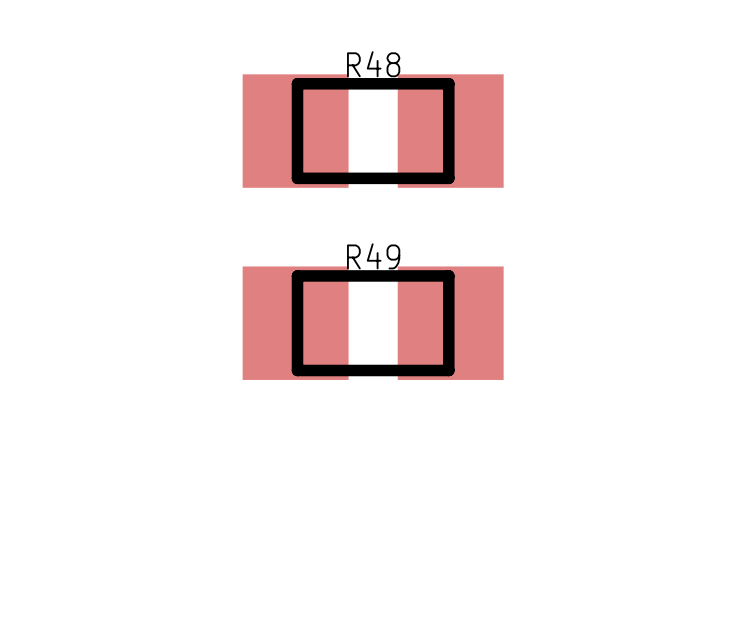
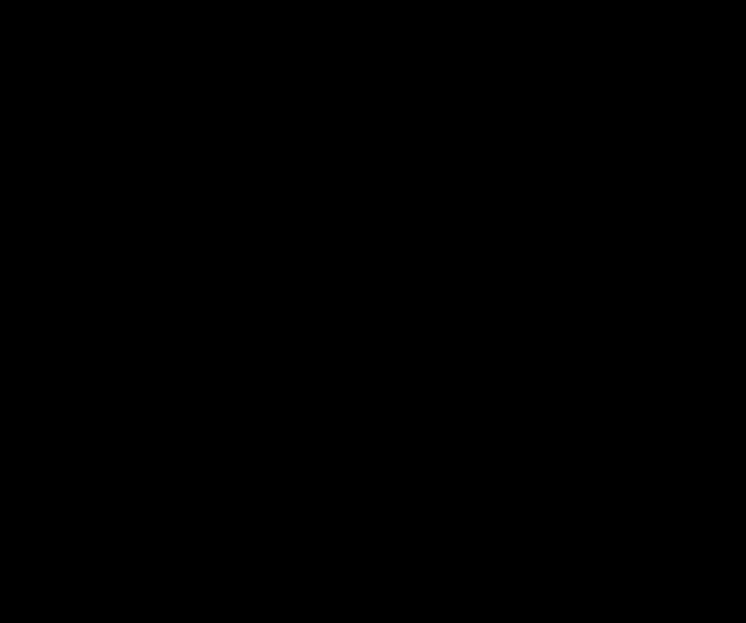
R48: (373, 131) -> none
R49: (373, 323) -> none

